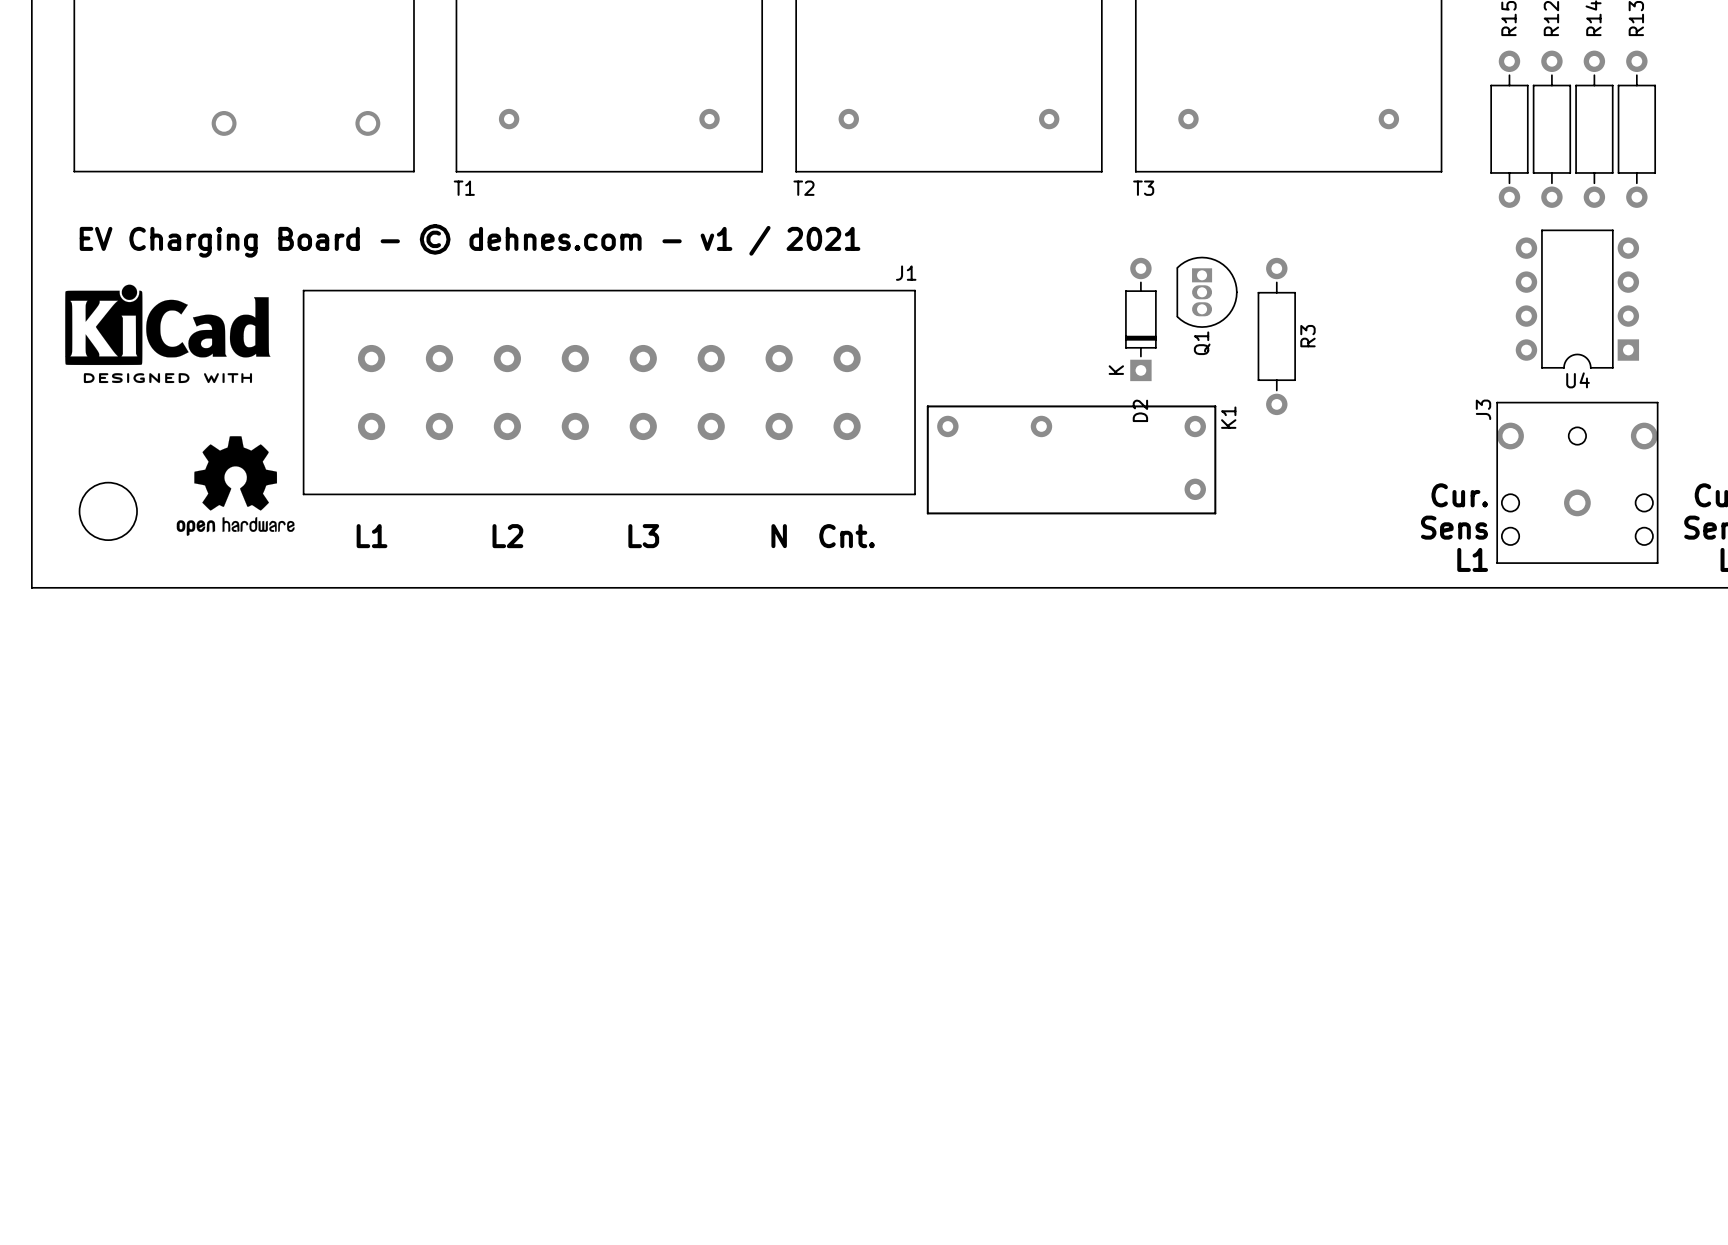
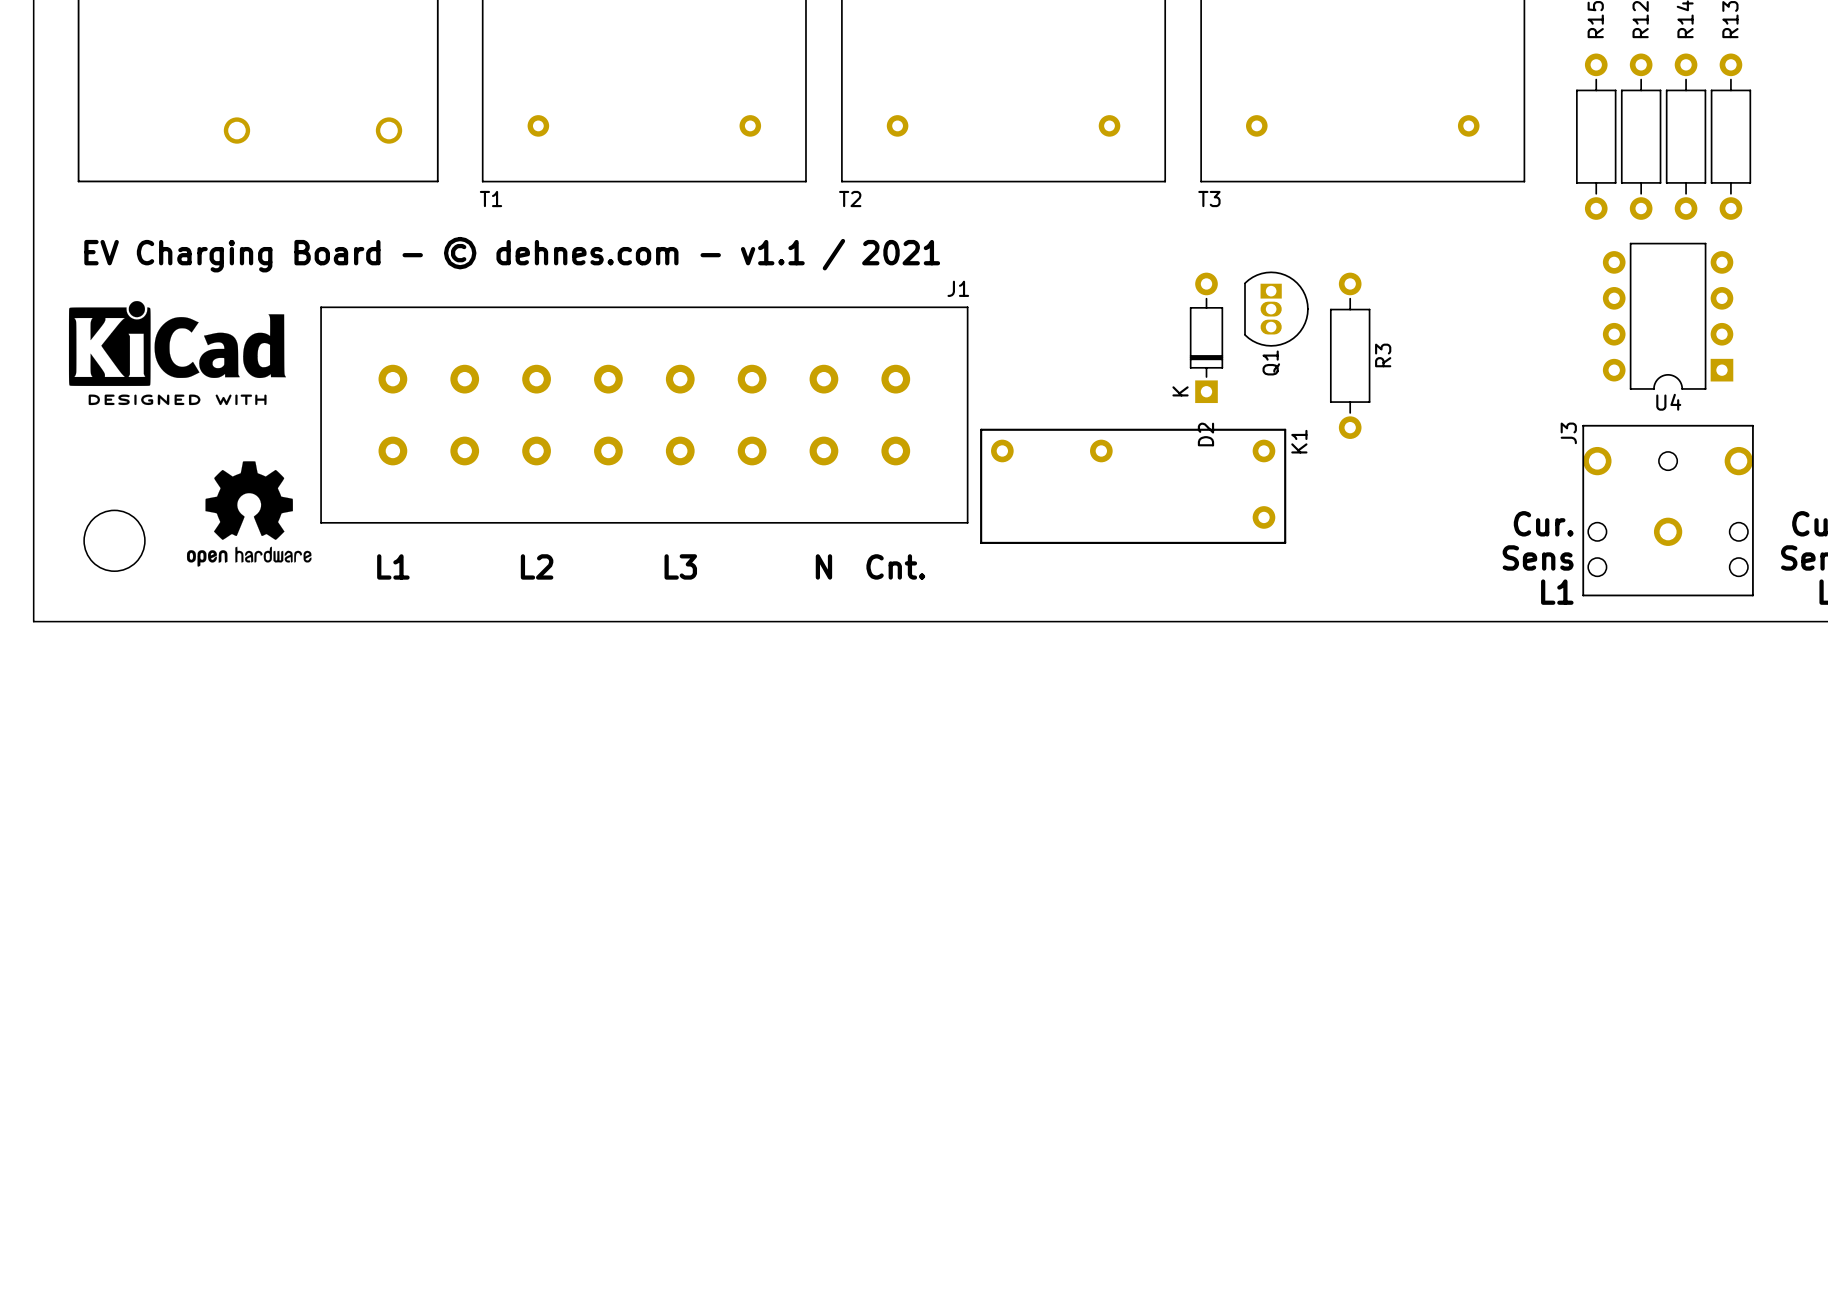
text: EV Charging Board - © dehnes.com - v1 / 2021 (470, 240) -> EV Charging Board - © dehnes.com - v1.1 / 2021 (512, 254)

